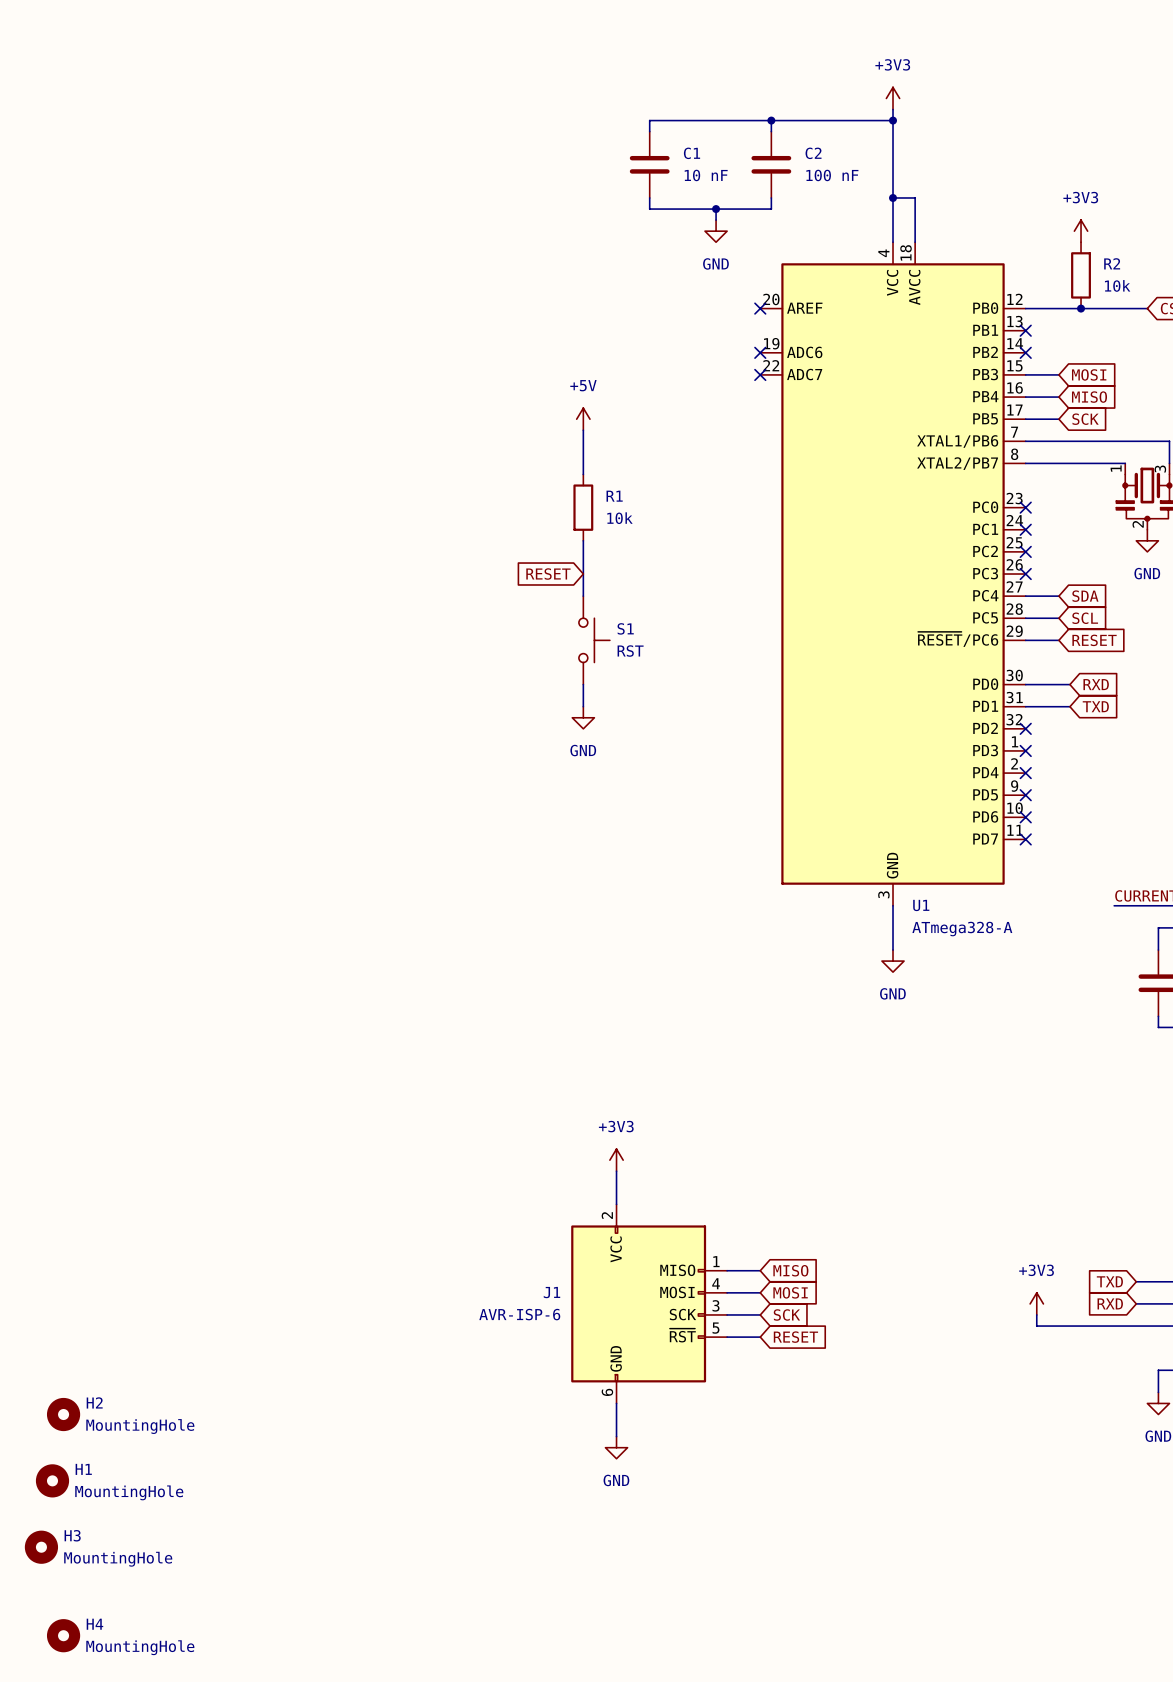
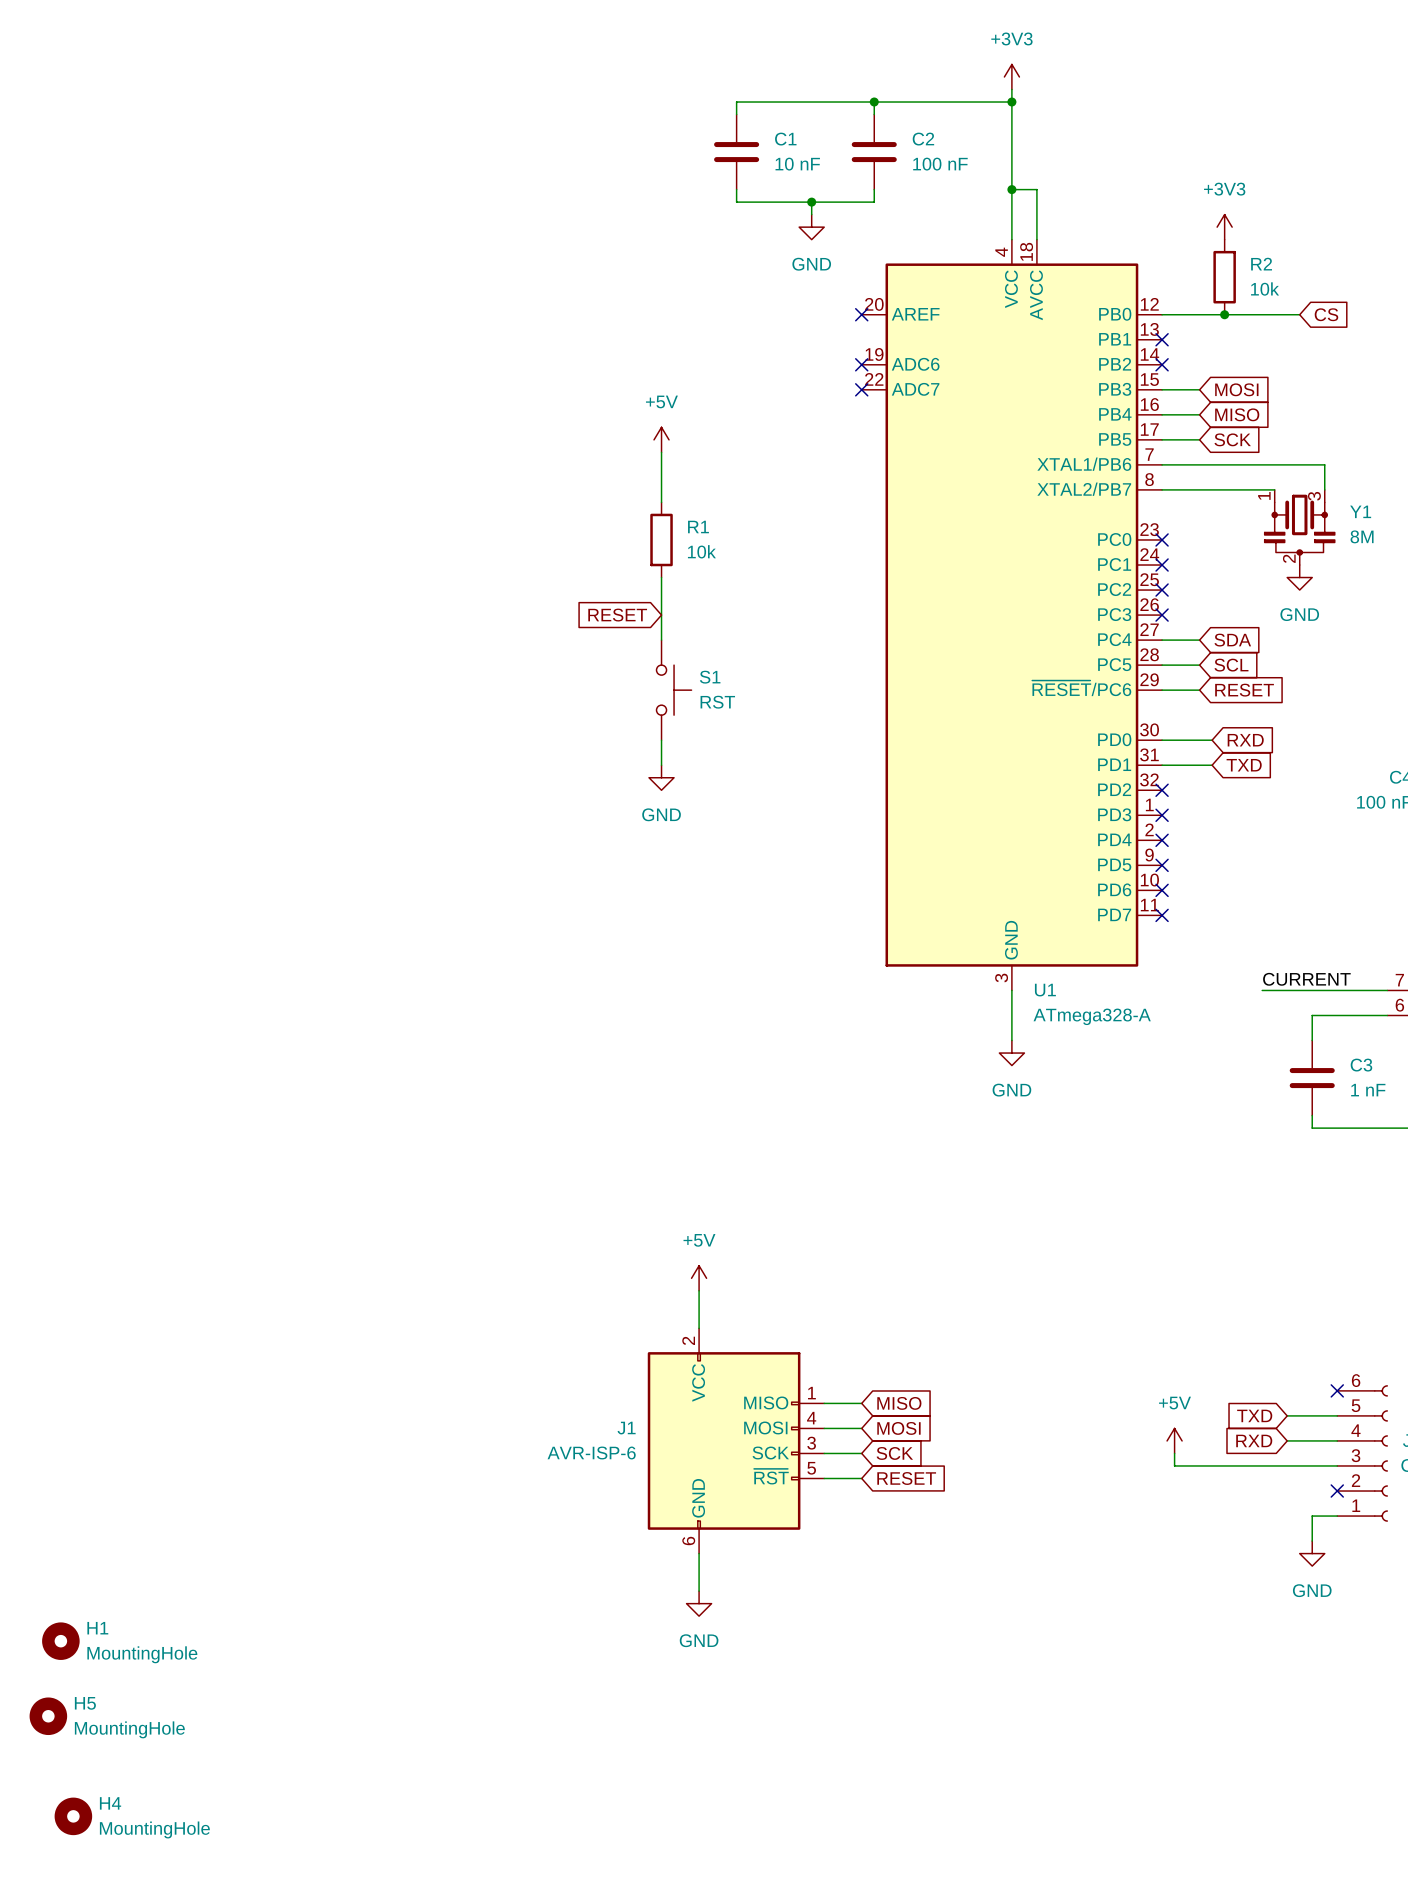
power symbol: +3V3 (616, 1160) -> +5V (699, 1278)
power symbol: +3V3 (1036, 1303) -> +5V (1174, 1440)
H2: MountingHole (63, 1414) -> none
H3 name: H3 (72, 1535) -> H5 (85, 1703)

